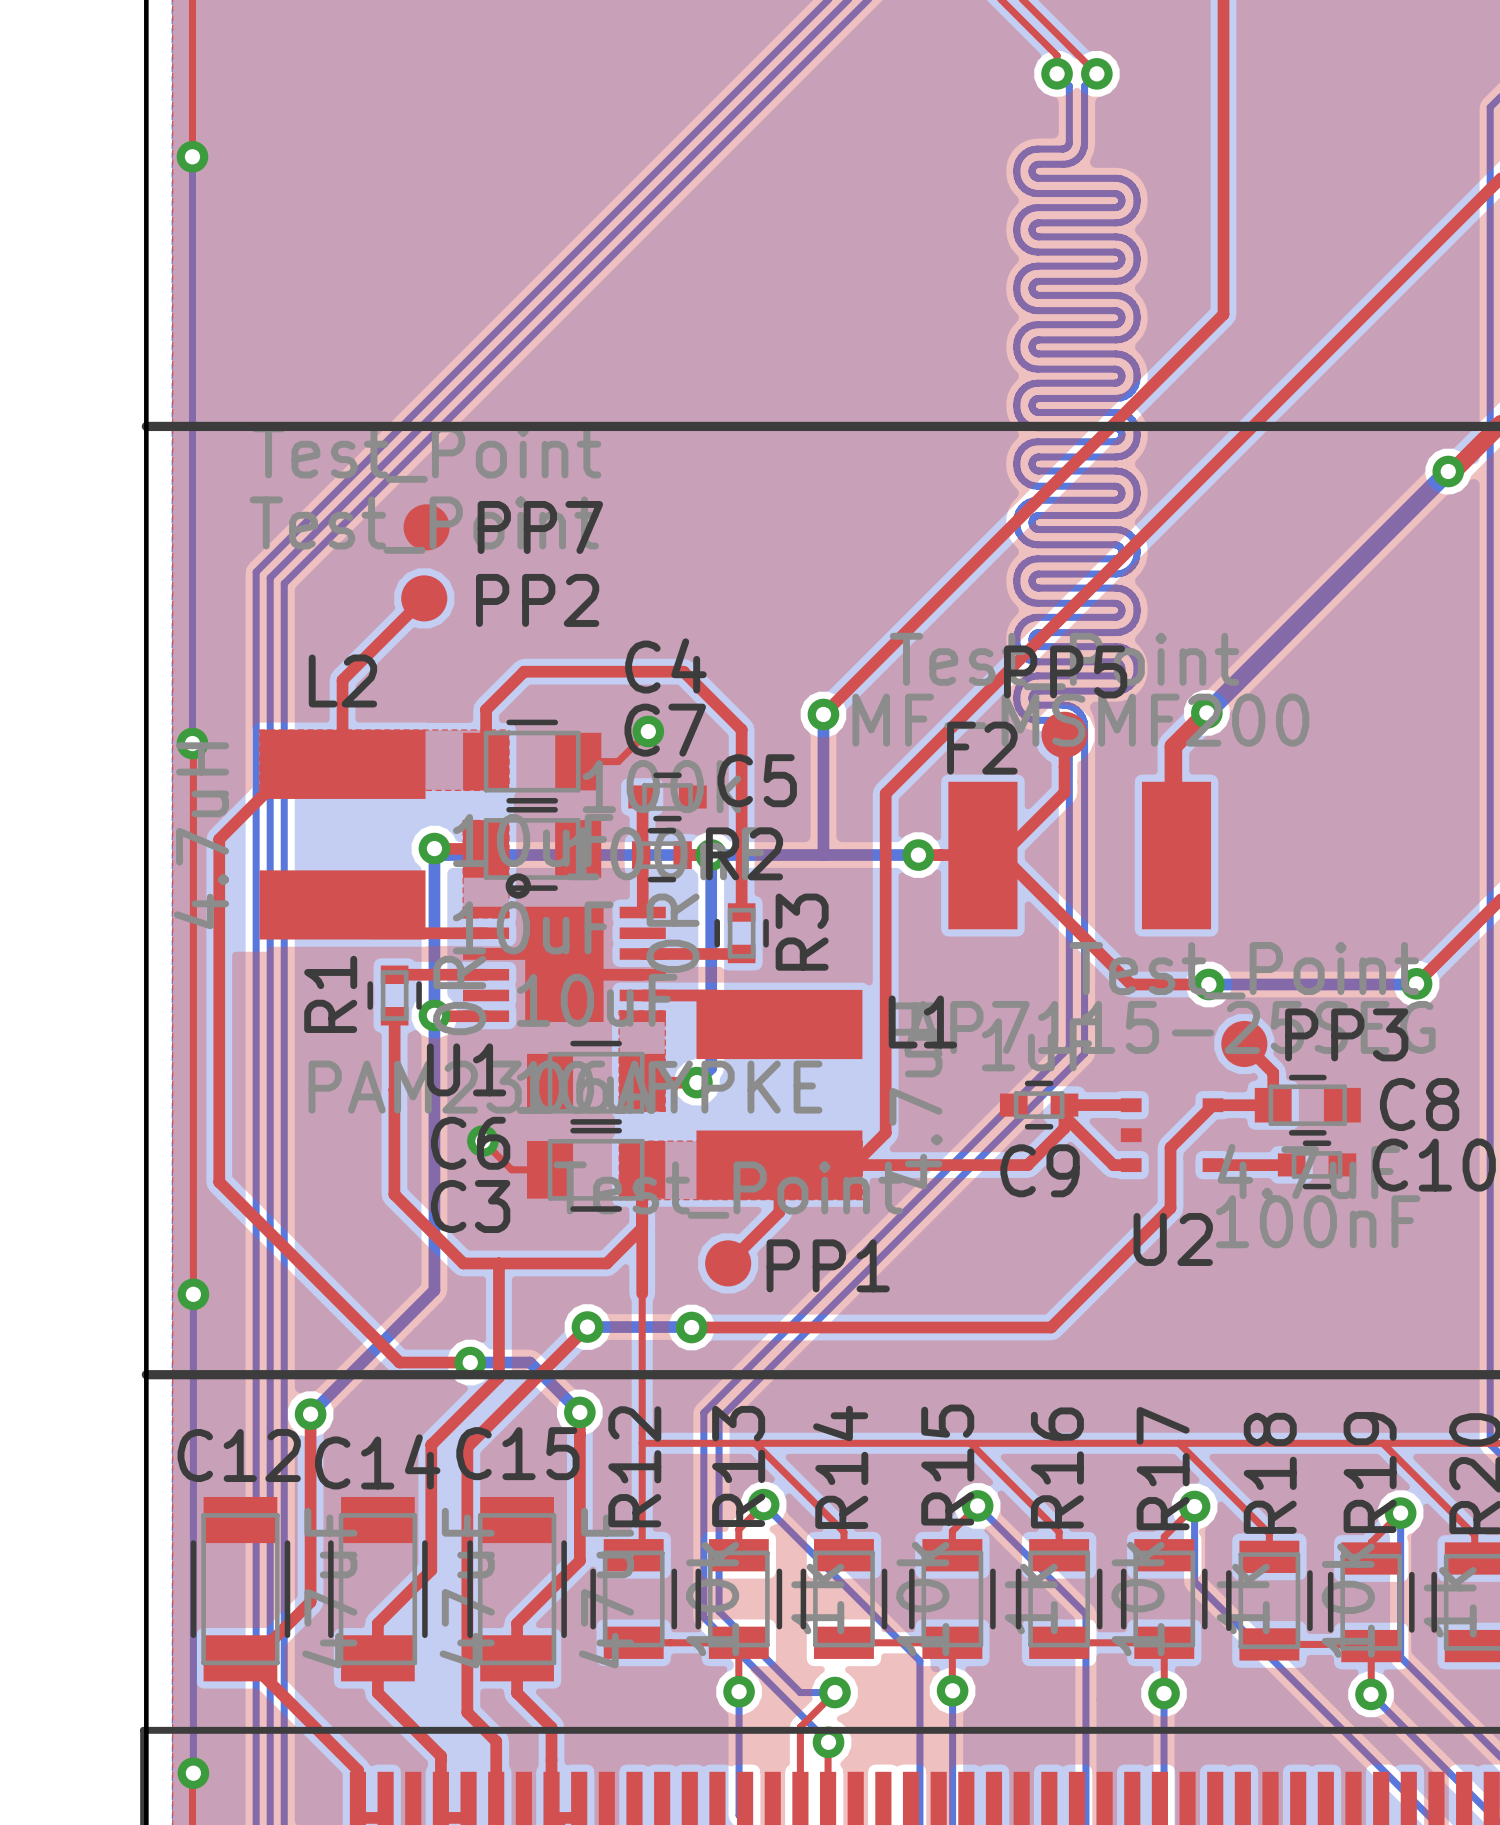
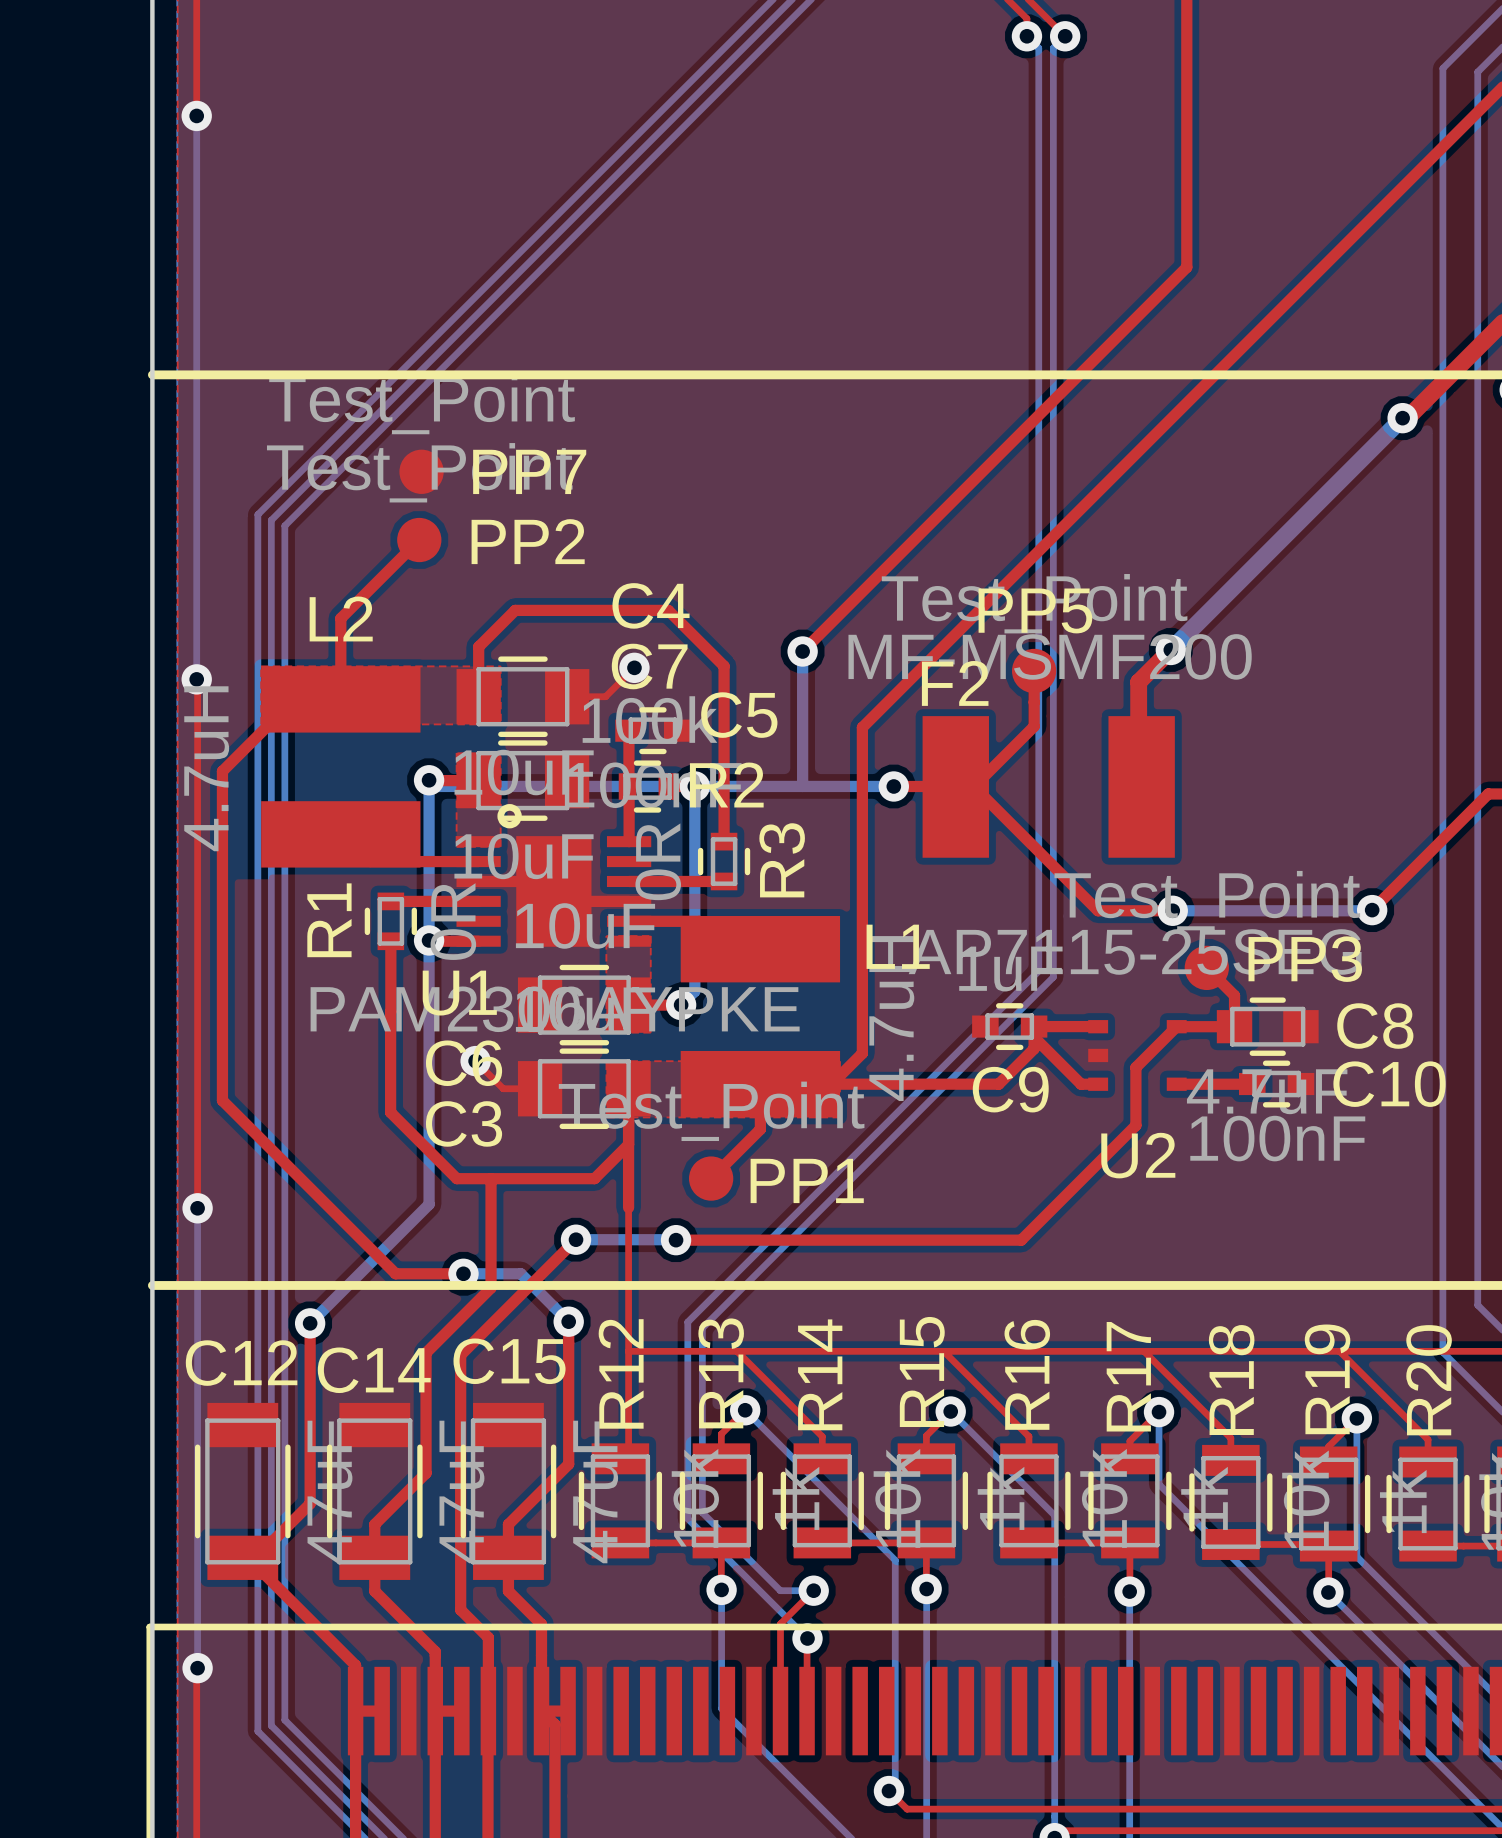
bottom track: (1069, 142) (1067, 146) (1063, 148) (1028, 151) (1018, 160) (1016, 170) (1017, 177) (1021, 185) (1033, 193) (1114, 193) (1119, 195) (1121, 200) (1120, 204) (1114, 207) (1033, 208) (1021, 215) (1016, 228) (1017, 235) (1021, 244) (1033, 251) (1114, 252) (1119, 253) (1121, 259) (1119, 264) (1114, 266) (1033, 266) (1021, 274) (1016, 287) (1017, 294) (1021, 302) (1033, 310) (1114, 310) (1119, 312) (1121, 316) (1120, 322) (1114, 324) (1033, 325) (1024, 329) (1017, 340) (1018, 357) (1024, 364) (1033, 368) (1114, 369) (1119, 370) (1121, 374) (1120, 380) (1114, 383) (1033, 383) (1024, 387) (1017, 399) (1018, 415) (1024, 423) (1033, 427) (1114, 427) (1119, 429) (1121, 433) (1120, 439) (1114, 441) (1033, 442) (1024, 446) (1017, 458) (1018, 474) (1024, 481) (1033, 485) (1114, 486) (1119, 487) (1121, 491) (1120, 497) (1114, 500) (1033, 500) (1024, 504) (1017, 516) (1018, 532) (1024, 540) (1033, 544) (1114, 544) (1119, 546) (1121, 550) (1120, 556) (1114, 558) (1033, 559) (1021, 566) (1017, 575) (1018, 591) (1024, 598) (1033, 602) (1114, 603) (1119, 604) (1121, 608) (1120, 614) (1114, 617) (1033, 617) (1024, 621) (1018, 629) (1017, 645) (1021, 653) (1028, 659) (1037, 661) (1114, 661) (1121, 665) (1121, 671) (1116, 675) (1037, 675) (1028, 677) (1021, 683) (1017, 692) (1016, 699) (1018, 708) (1024, 715) (1033, 719) (1063, 720) (1067, 723) (1069, 727) -> (1038, 101) (1038, 663)
bottom track: (1084, 143) (1079, 156) (1072, 162) (1037, 164) (1033, 166) (1031, 171) (1033, 175) (1039, 178) (1120, 178) (1132, 186) (1137, 199) (1136, 206) (1132, 214) (1120, 222) (1039, 222) (1033, 225) (1031, 229) (1033, 234) (1039, 236) (1120, 237) (1132, 244) (1137, 257) (1136, 265) (1132, 273) (1120, 280) (1039, 281) (1033, 284) (1031, 288) (1033, 292) (1039, 295) (1120, 295) (1129, 299) (1136, 311) (1135, 328) (1129, 335) (1120, 339) (1039, 339) (1034, 341) (1032, 345) (1033, 351) (1039, 353) (1120, 354) (1132, 361) (1136, 370) (1135, 386) (1129, 393) (1120, 397) (1039, 398) (1034, 399) (1032, 403) (1033, 409) (1039, 412) (1120, 413) (1132, 420) (1136, 428) (1135, 445) (1129, 452) (1120, 456) (1039, 456) (1034, 458) (1032, 462) (1033, 468) (1039, 471) (1120, 471) (1132, 478) (1136, 487) (1135, 503) (1129, 510) (1120, 514) (1039, 515) (1034, 517) (1032, 520) (1033, 526) (1039, 529) (1120, 530) (1132, 537) (1136, 545) (1135, 562) (1129, 569) (1120, 573) (1039, 574) (1034, 575) (1032, 579) (1033, 585) (1039, 588) (1120, 588) (1129, 592) (1135, 599) (1136, 616) (1132, 624) (1125, 630) (1116, 632) (1039, 632) (1032, 636) (1032, 642) (1037, 646) (1120, 647) (1129, 651) (1135, 658) (1136, 674) (1132, 683) (1125, 689) (1116, 691) (1039, 691) (1032, 695) (1032, 701) (1037, 704) (1072, 707) (1079, 713) (1084, 726) -> (1053, 103) (1053, 662)

